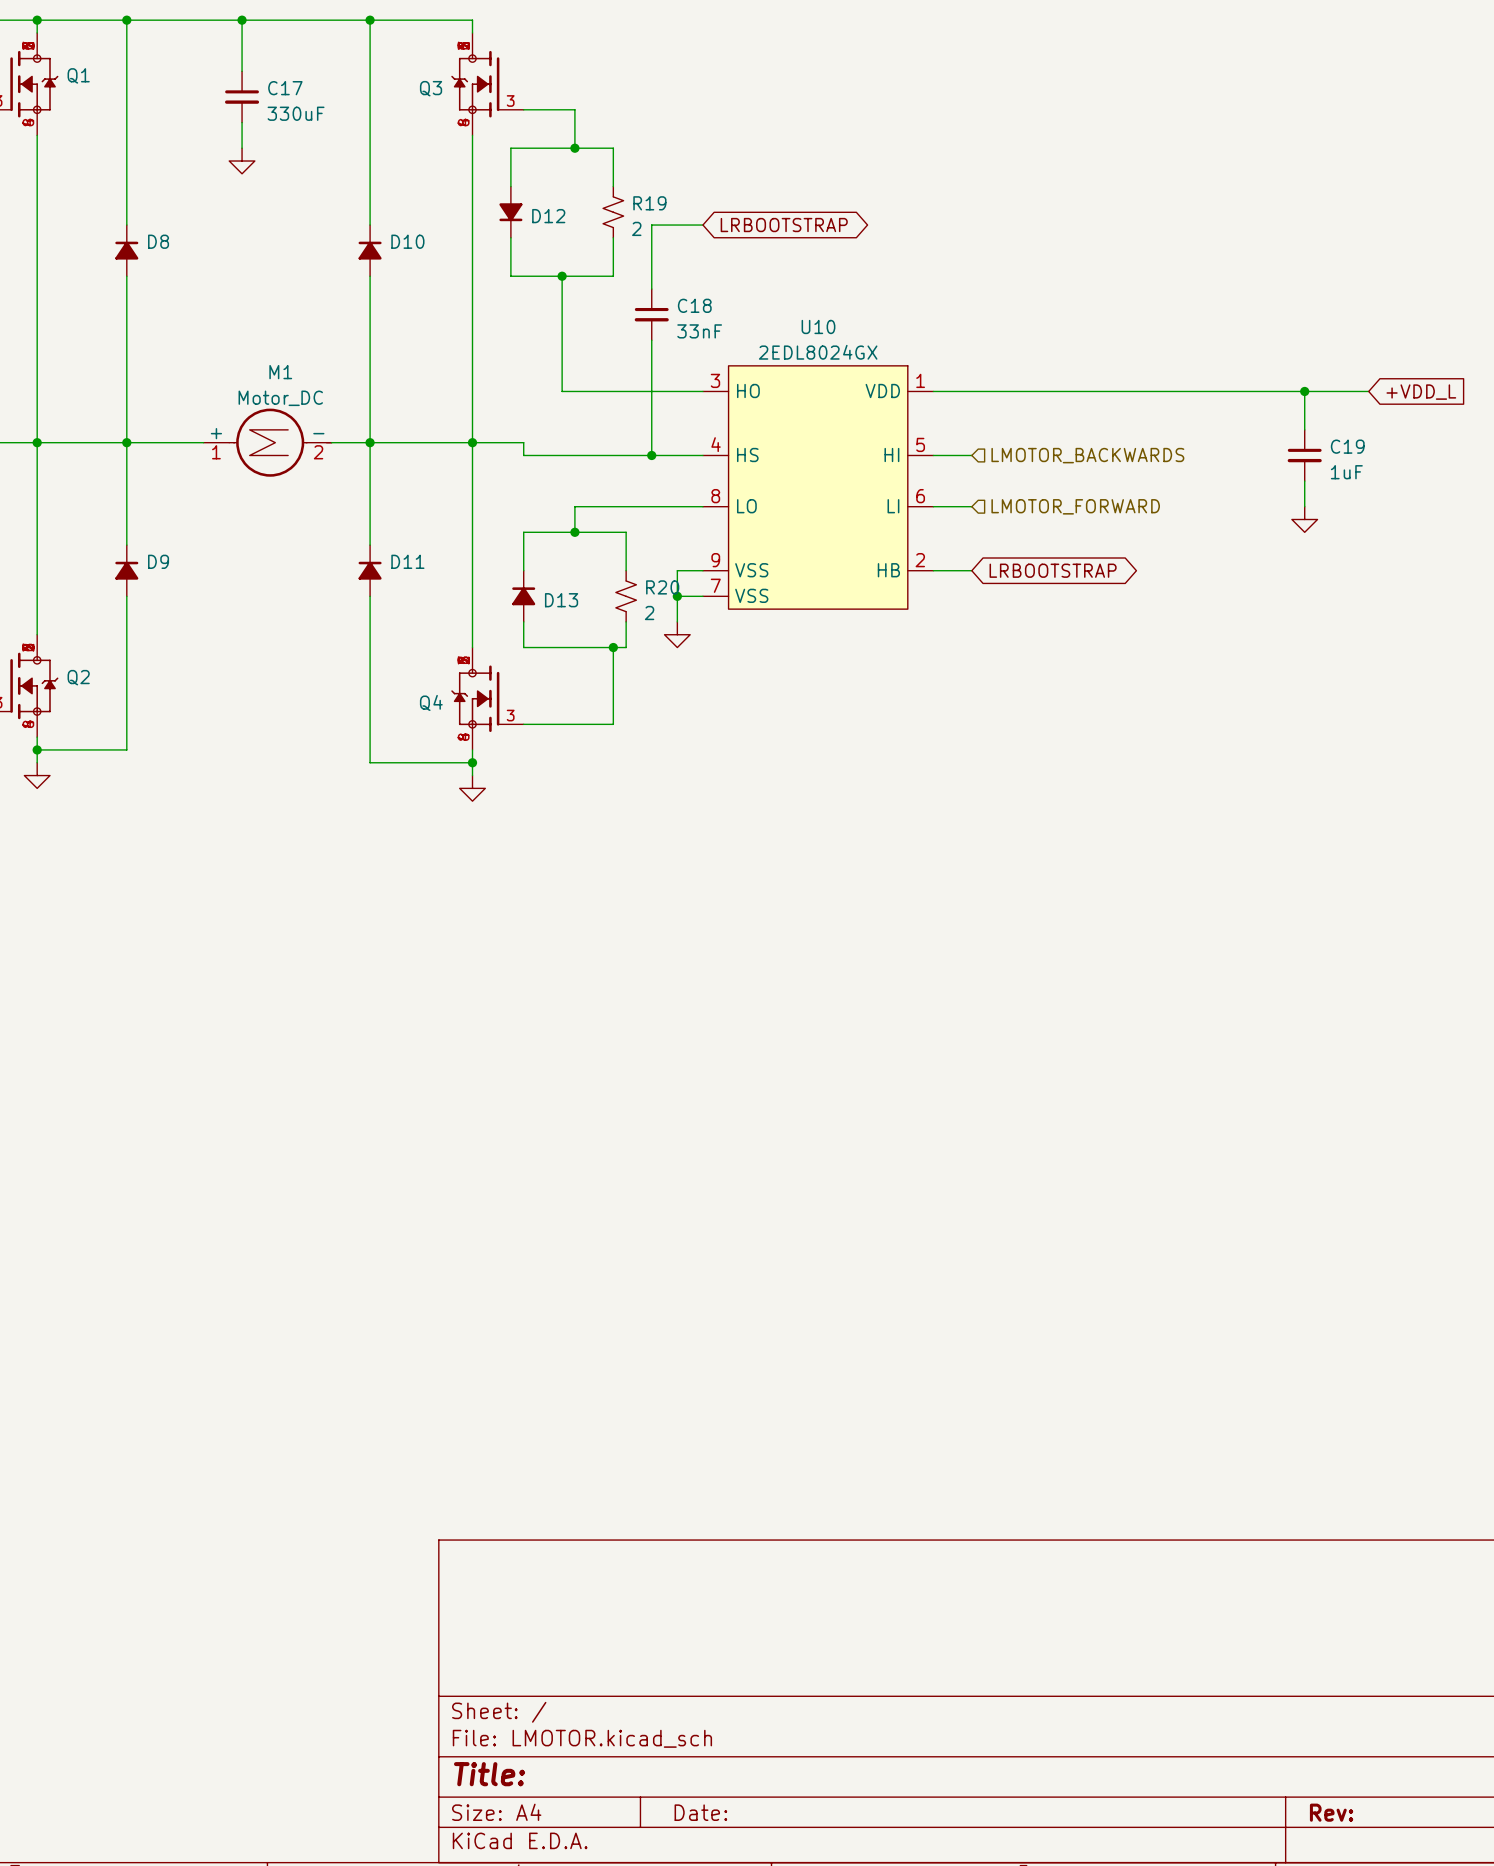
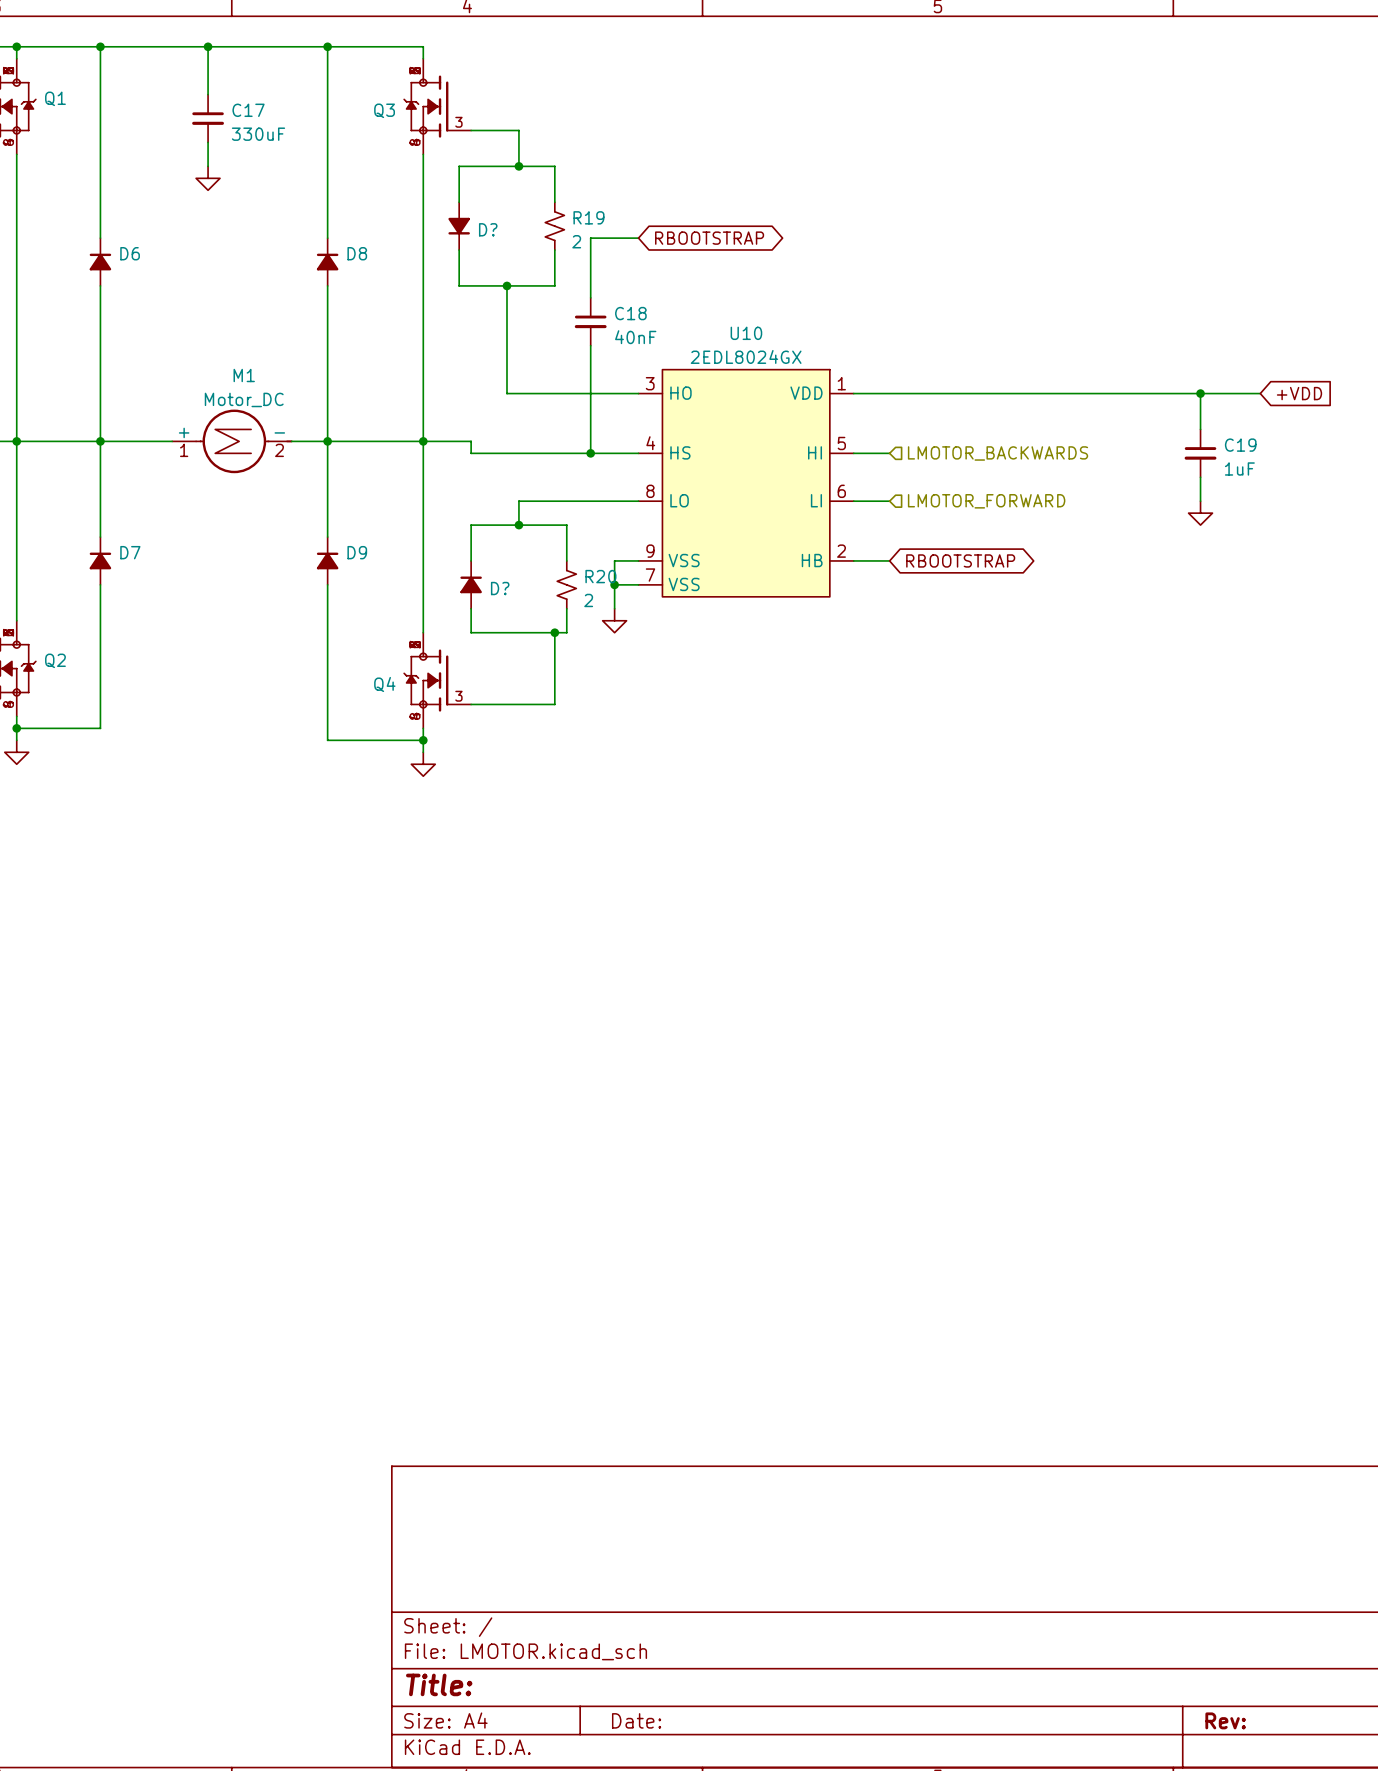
D12 name: D12 (548, 216) -> D? (488, 229)
global label: LRBOOTSTRAP (784, 225) -> RBOOTSTRAP (709, 238)
D8 name: D8 (158, 241) -> D6 (130, 253)
D10 name: D10 (407, 241) -> D8 (357, 253)
C18 value: 33nF (699, 331) -> 40nF (635, 337)
global label: +VDD_L (1421, 392) -> +VDD (1299, 393)
D9 name: D9 (158, 561) -> D7 (130, 552)
D11 name: D11 (407, 561) -> D9 (357, 552)
global label: LRBOOTSTRAP (1053, 570) -> RBOOTSTRAP (960, 560)
D13 name: D13 (561, 600) -> D? (500, 588)

